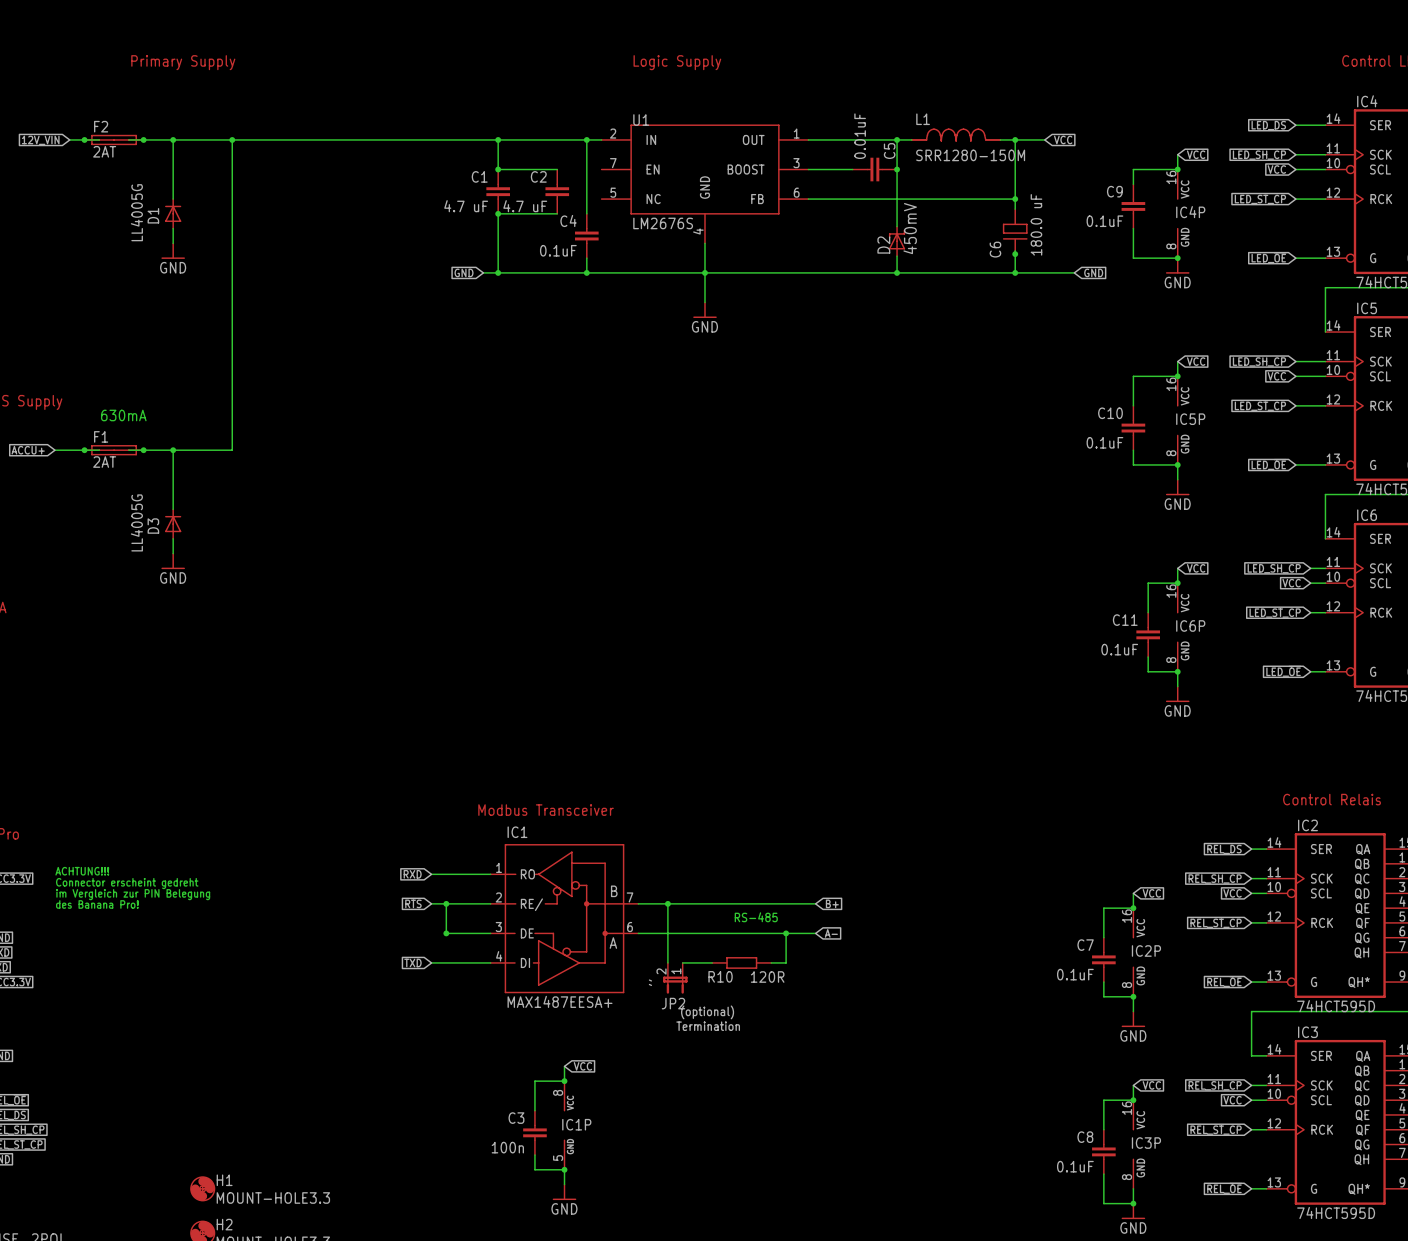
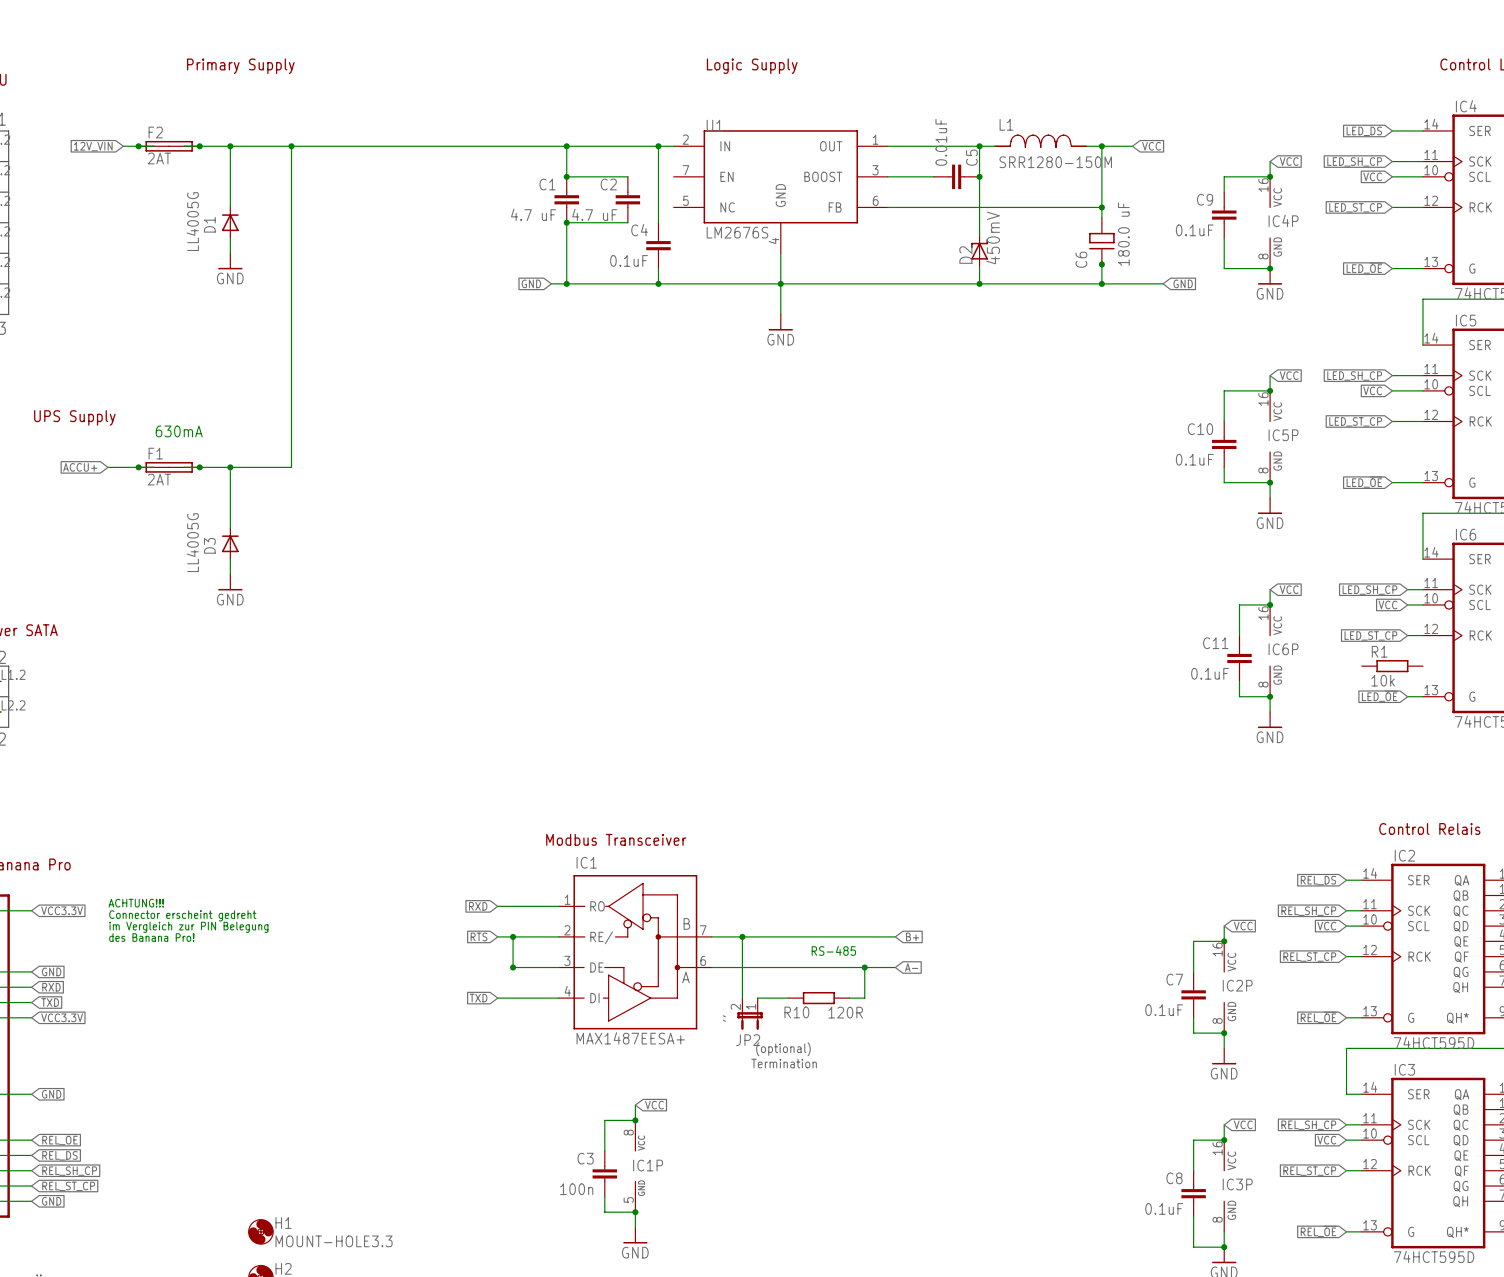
R1: none -> 10k (1392, 666)

